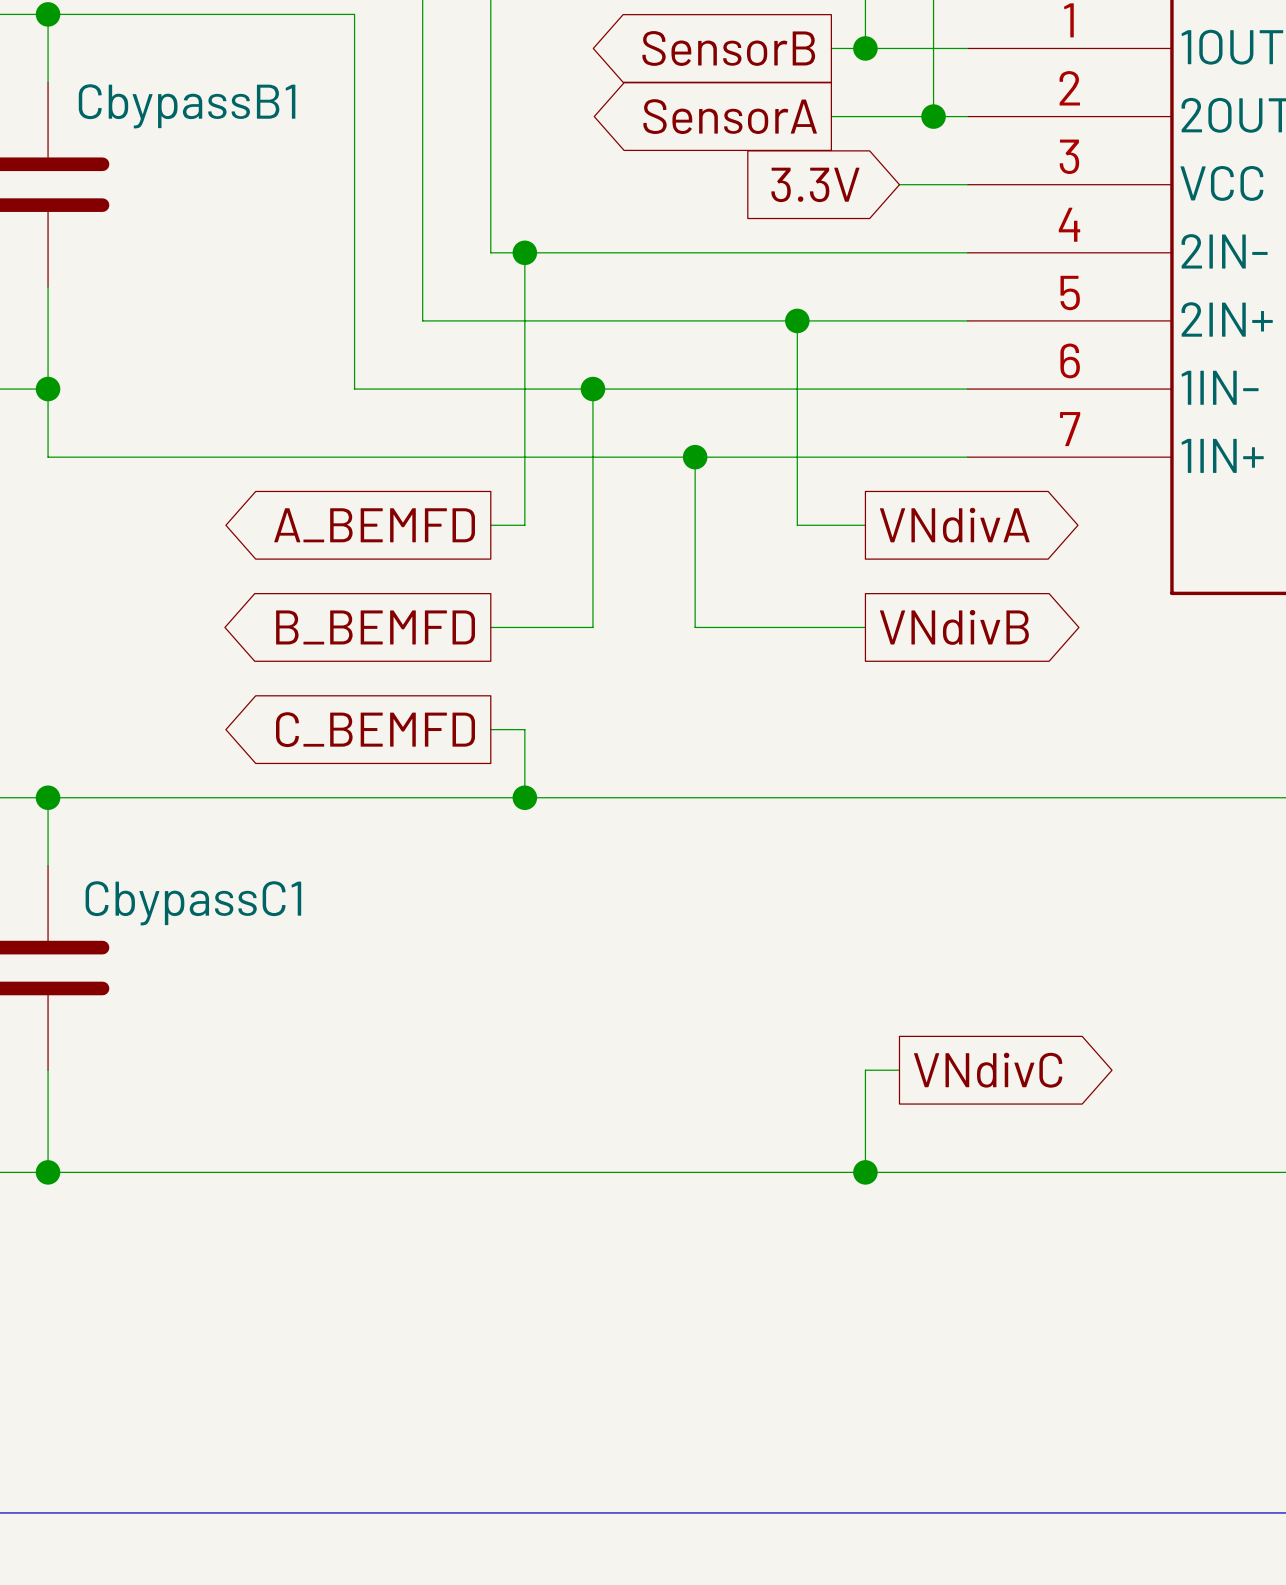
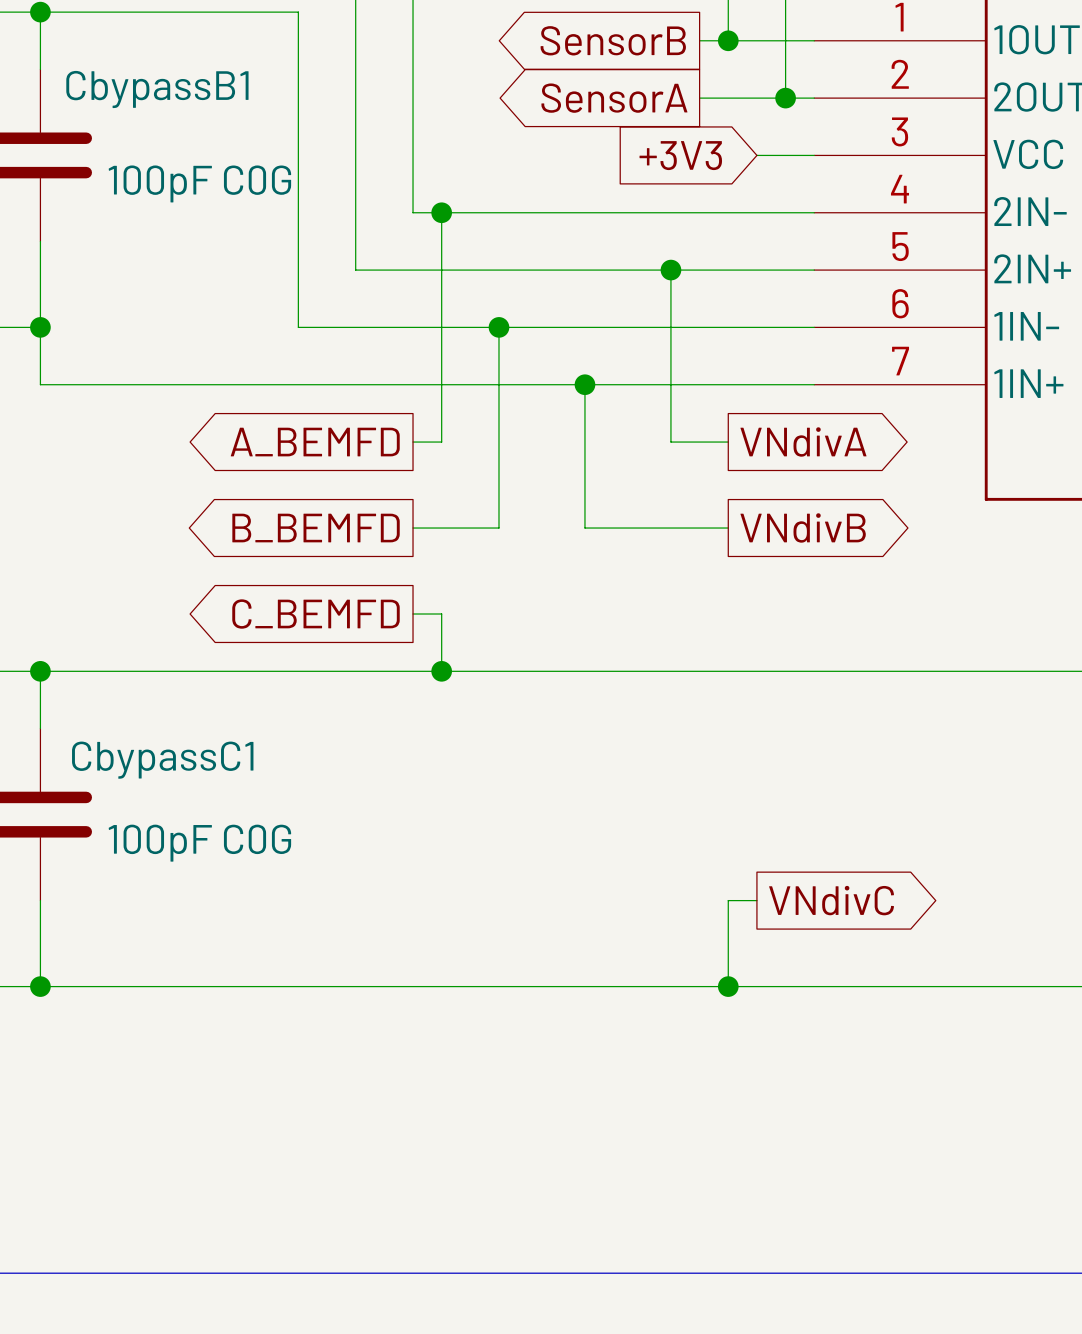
global label: 3.3V (815, 184) -> +3V3 (680, 155)
CbypassB1 value: none -> 100pF C0G (199, 183)
CbypassC1 value: none -> 100pF C0G (199, 843)

